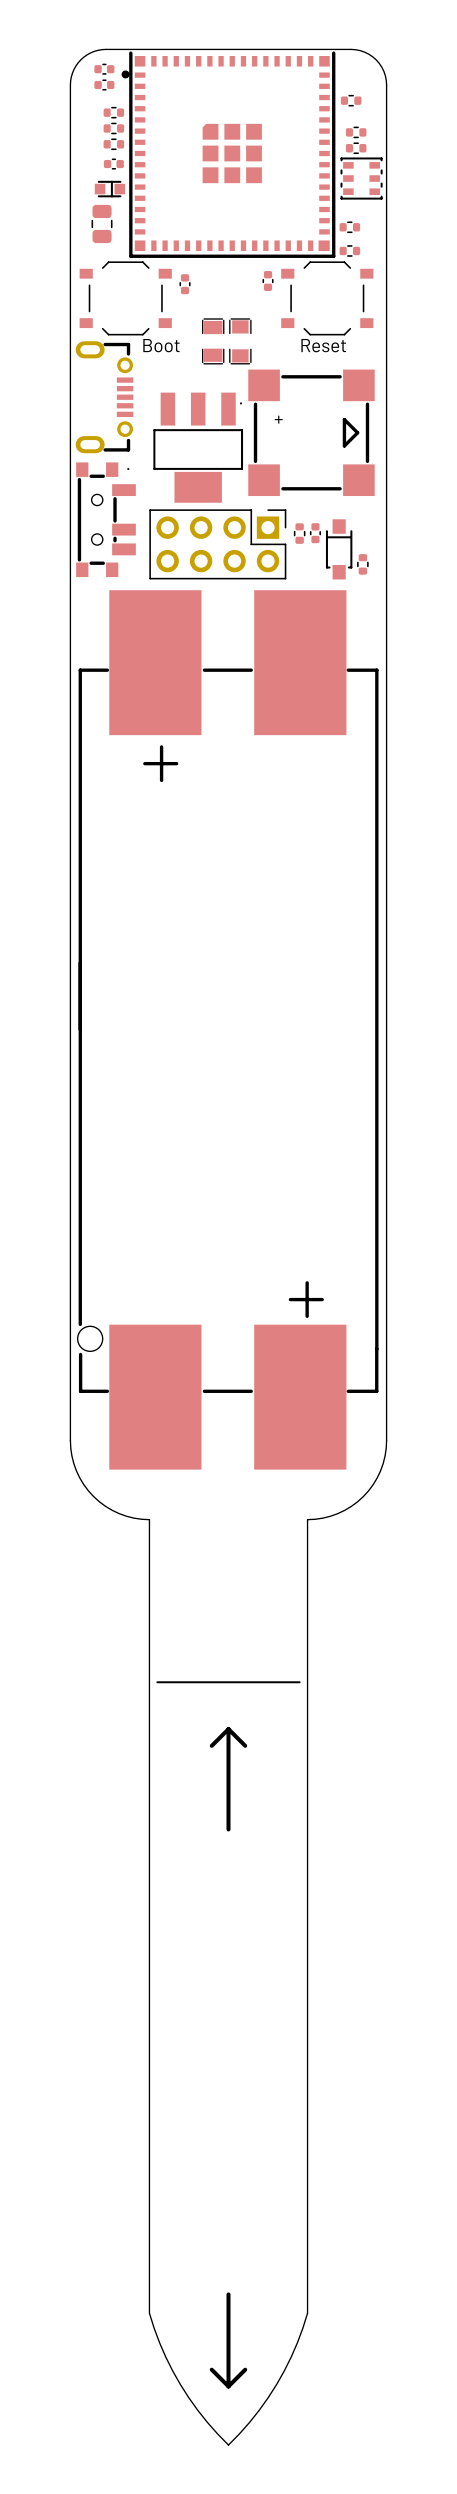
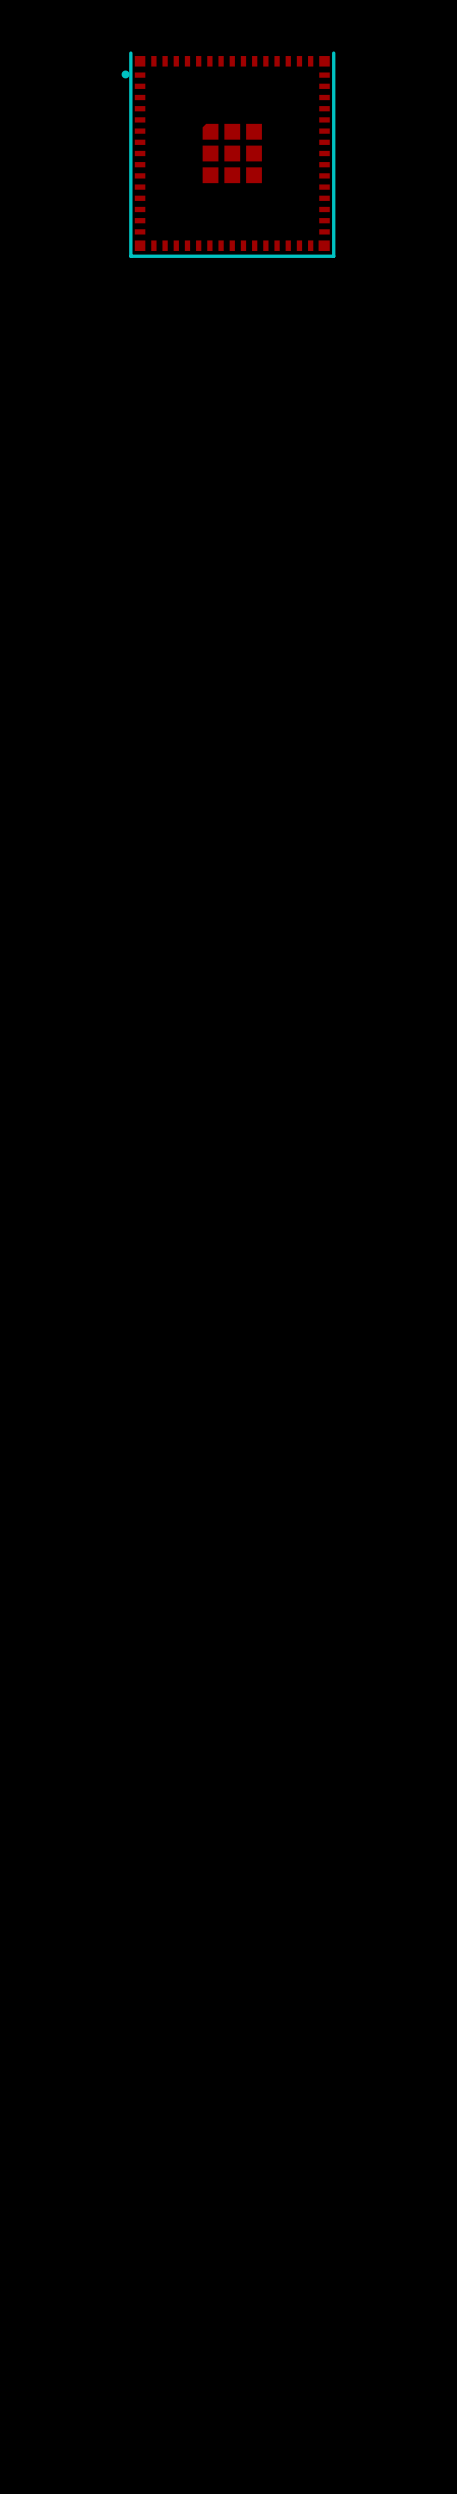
board edge: (105, 49) (355, 49) (368, 54) (376, 59) (383, 71) (386, 84) (386, 1448) (383, 1463) (377, 1477) (363, 1496) (351, 1506) (337, 1513) (322, 1518) (307, 1519) (307, 2313) (297, 2342) (276, 2384) (259, 2410) (228, 2445) (197, 2410) (180, 2384) (159, 2342) (149, 2313) (149, 1519) (134, 1518) (119, 1513) (105, 1506) (93, 1496) (83, 1484) (76, 1470) (70, 1448) (70, 84) (72, 73) (80, 59) (94, 51) (105, 49) -> none
part: (104, 69) -> none
part: (104, 84) -> none
part: (351, 100) -> none
part: (113, 112) -> none
part: (113, 128) -> none
part: (356, 132) -> none
part: (113, 144) -> none
part: (356, 148) -> none
part: (113, 164) -> none
part: (361, 178) -> none
part: (109, 189) -> none
part: (102, 223) -> none
part: (349, 227) -> none
part: (349, 250) -> none
part: (268, 281) -> none
part: (185, 284) -> none
part: (125, 298) -> none
part: (327, 298) -> none
part: (213, 341) -> none
part: (240, 341) -> none
text: Boot (161, 345) -> none
text: Reset (323, 345) -> none
part: (104, 397) -> none
part: (311, 432) -> none
part: (198, 447) -> none
part: (105, 519) -> none
part: (299, 533) -> none
part: (315, 533) -> none
part: (217, 544) -> none
part: (339, 549) -> none
part: (362, 564) -> none
part: (228, 1029) -> none
line: (157, 1682) (299, 1682) -> none
line: (228, 1729) (228, 1829) -> none
line: (228, 1729) (211, 1745) -> none
line: (228, 1729) (245, 1745) -> none
line: (228, 2294) (228, 2386) -> none
line: (211, 2369) (228, 2386) -> none
line: (245, 2369) (228, 2386) -> none

